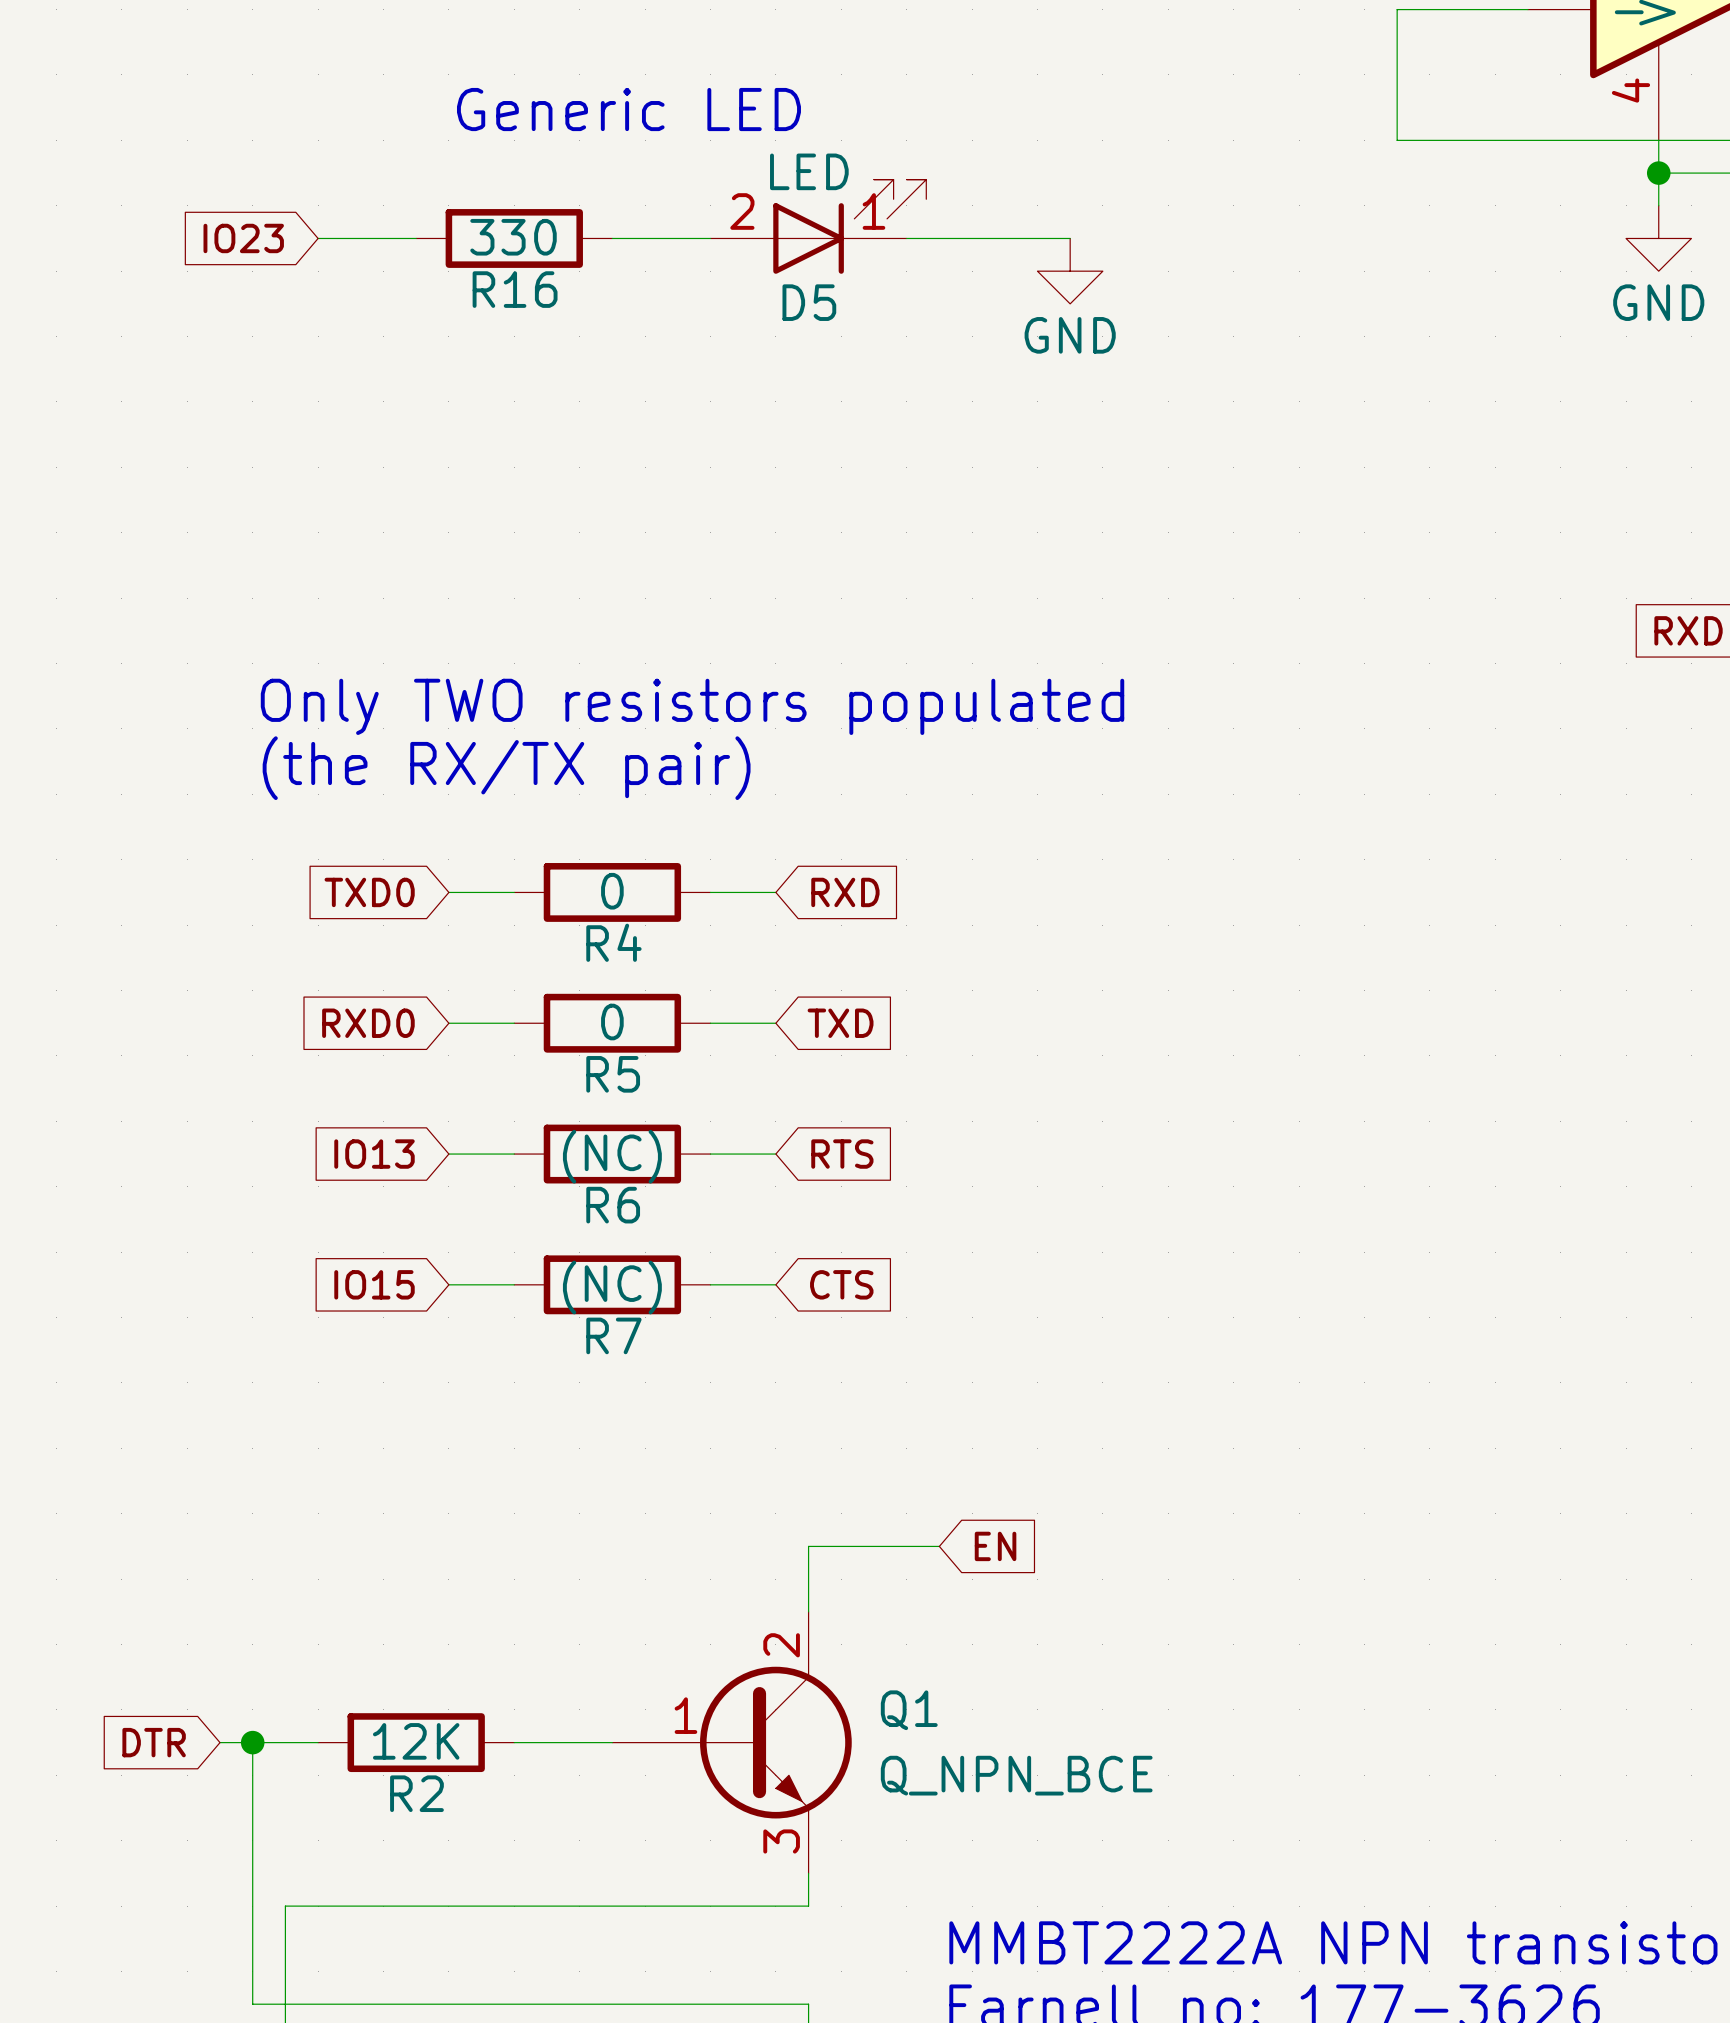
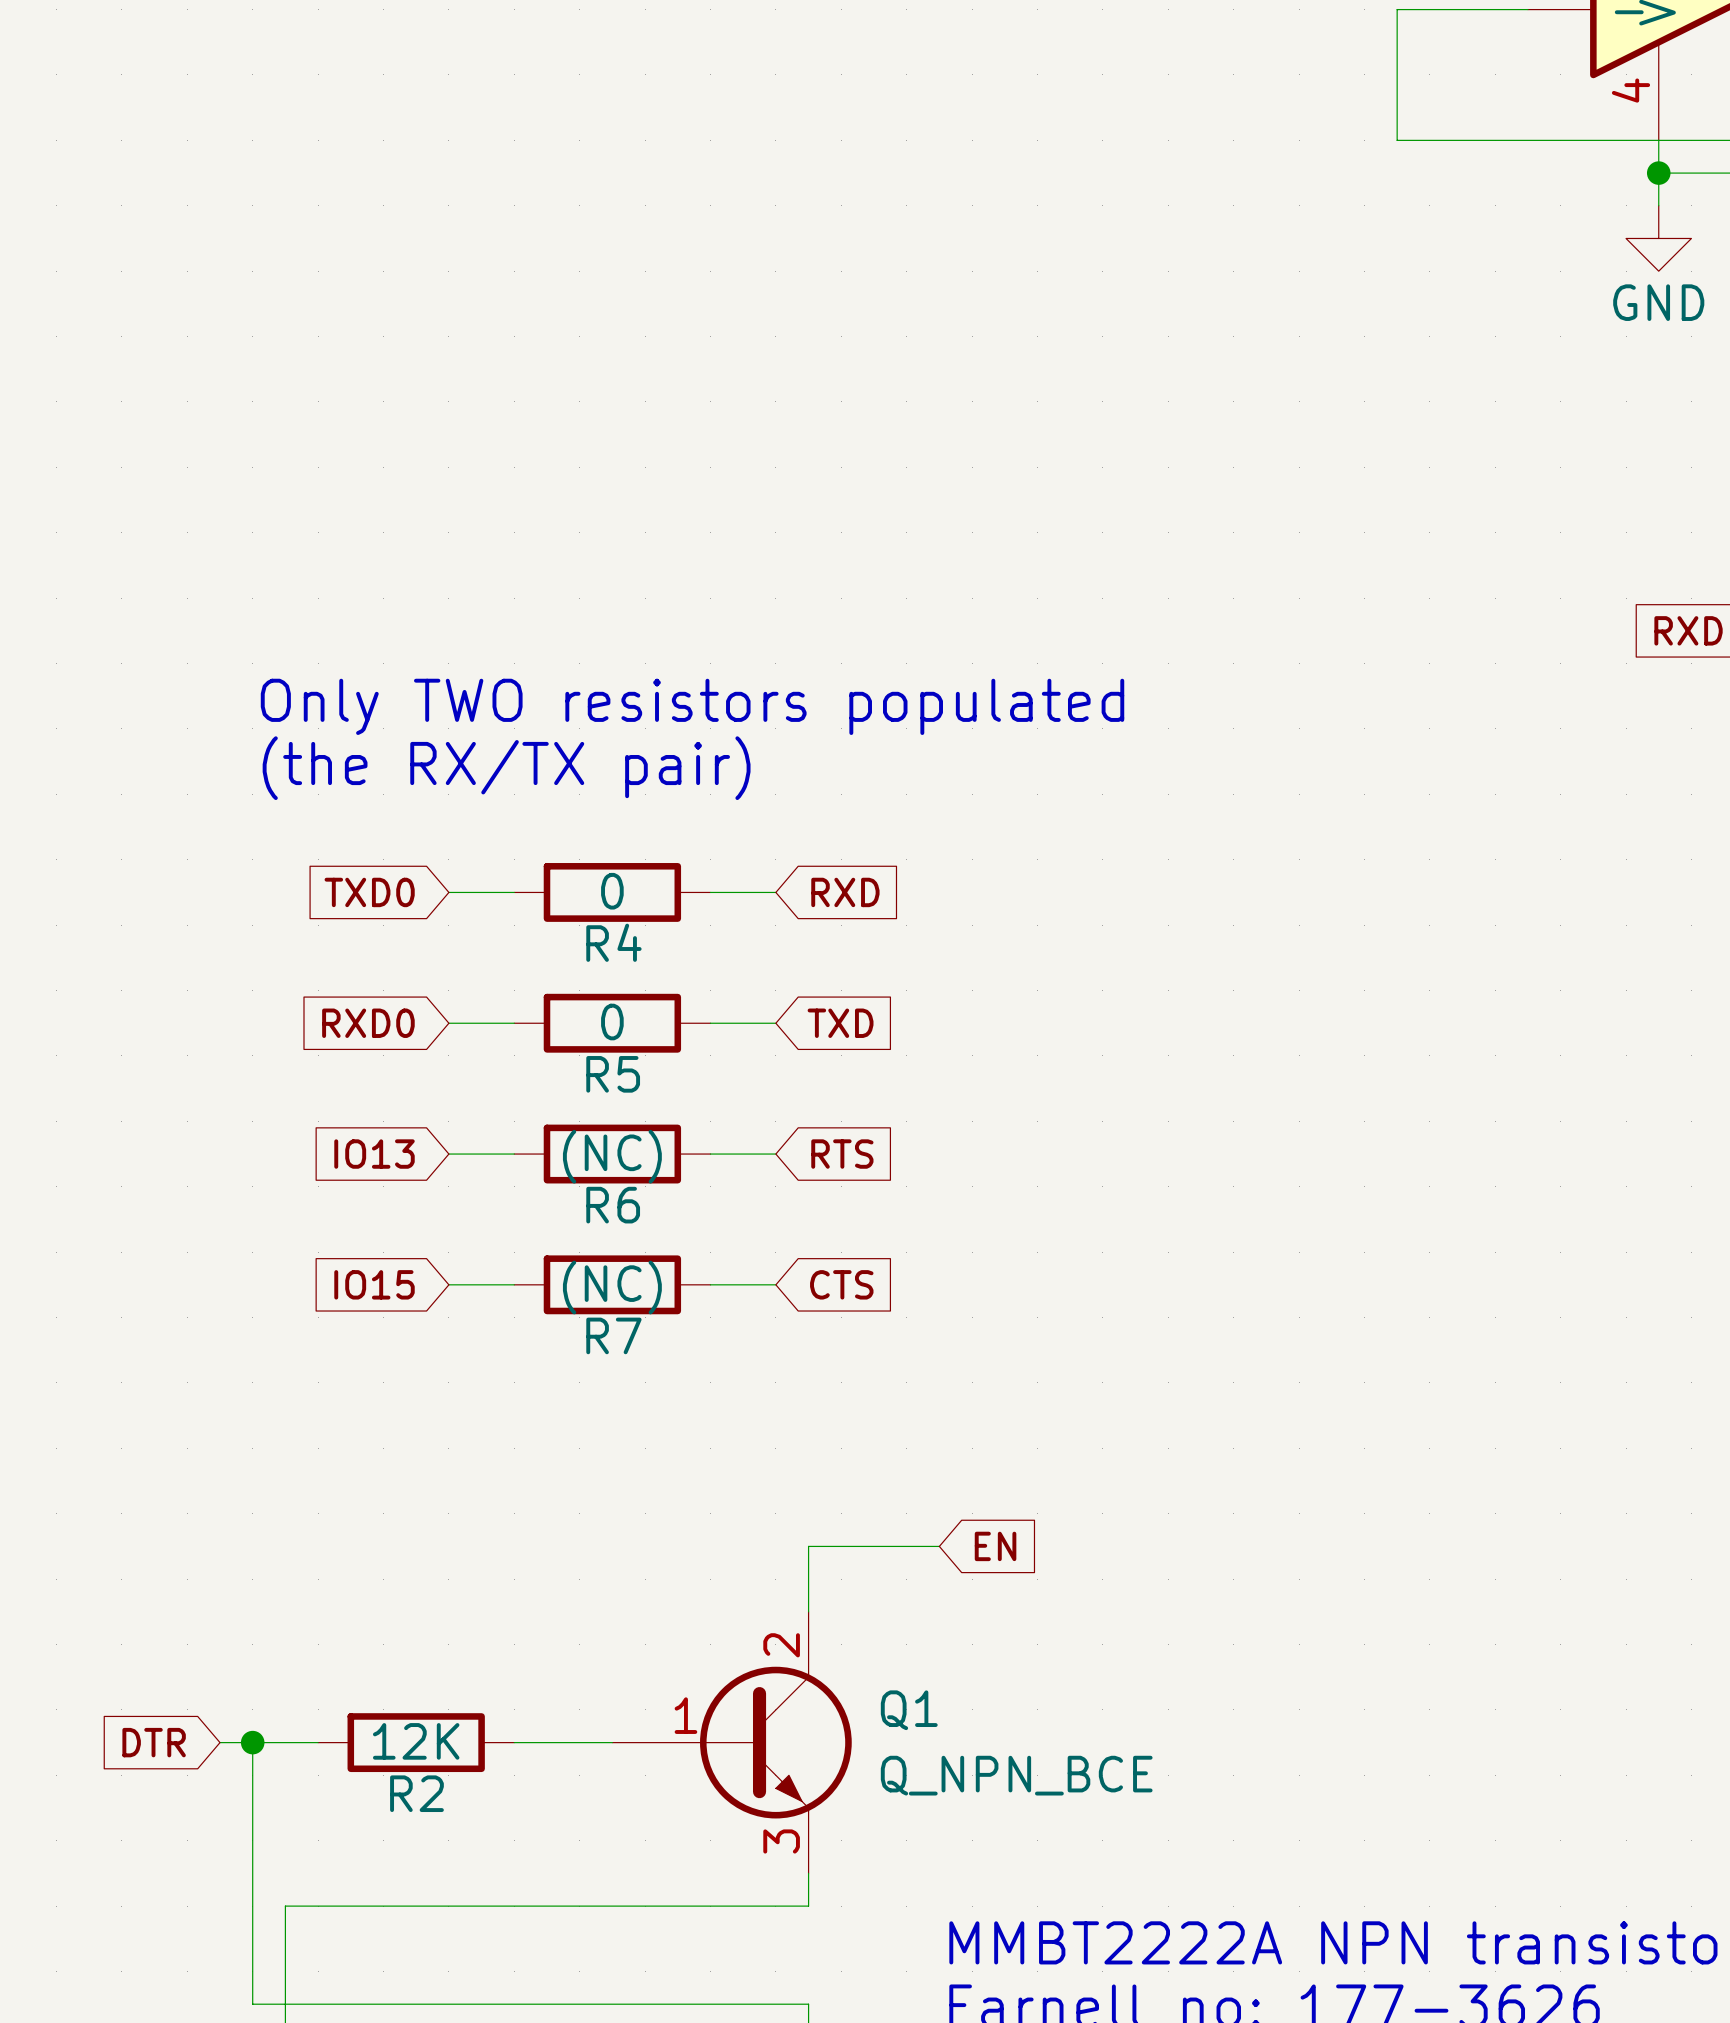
text: Generic LED (628, 109) -> none
D5: LED (818, 226) -> none
global label: IO23 (243, 238) -> none
wire: (318, 238) (416, 238) -> none
R16: 330 (514, 238) -> none
wire: (612, 238) (710, 238) -> none
wire: (906, 238) (1070, 238) -> none
power symbol: GND (1070, 271) -> none

